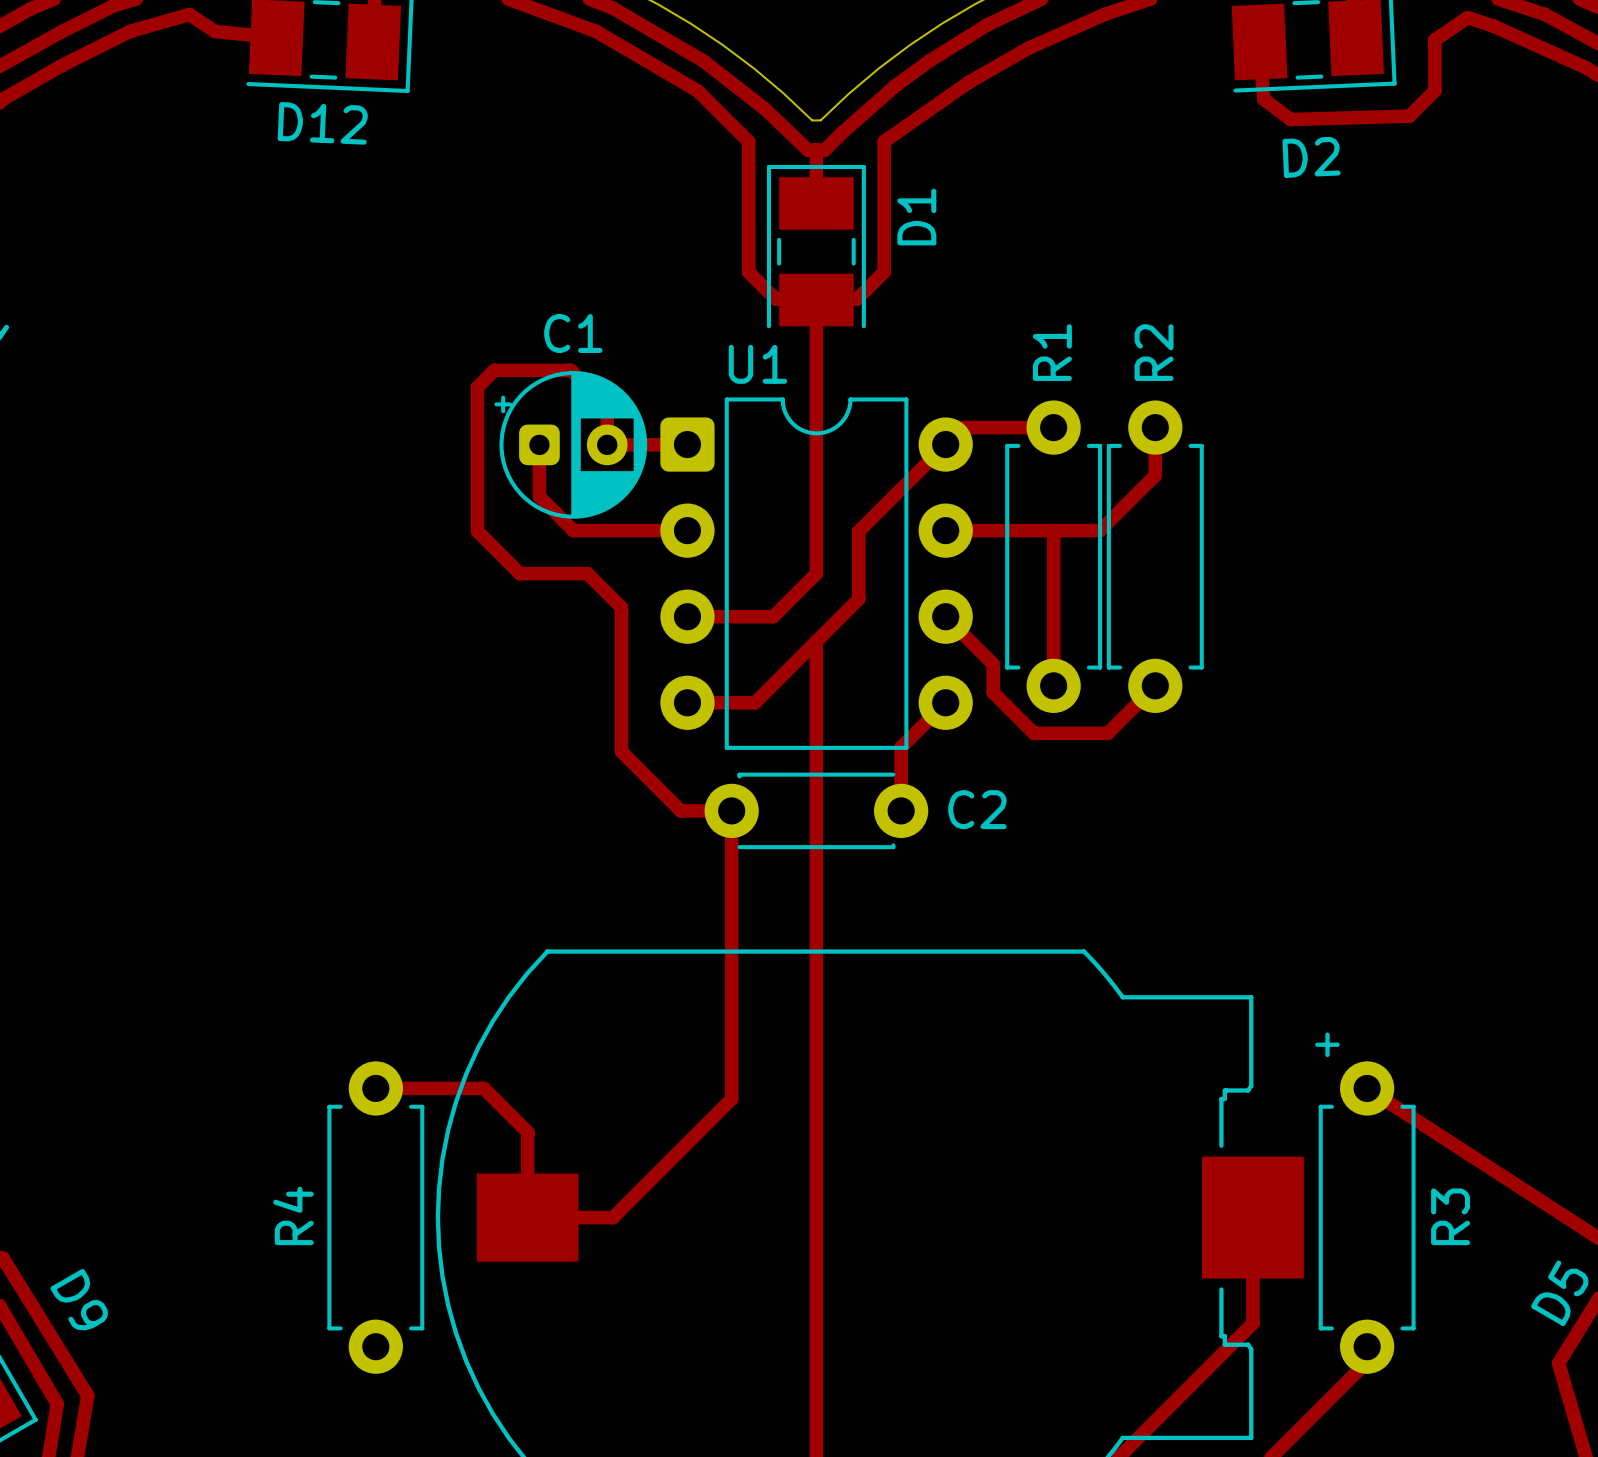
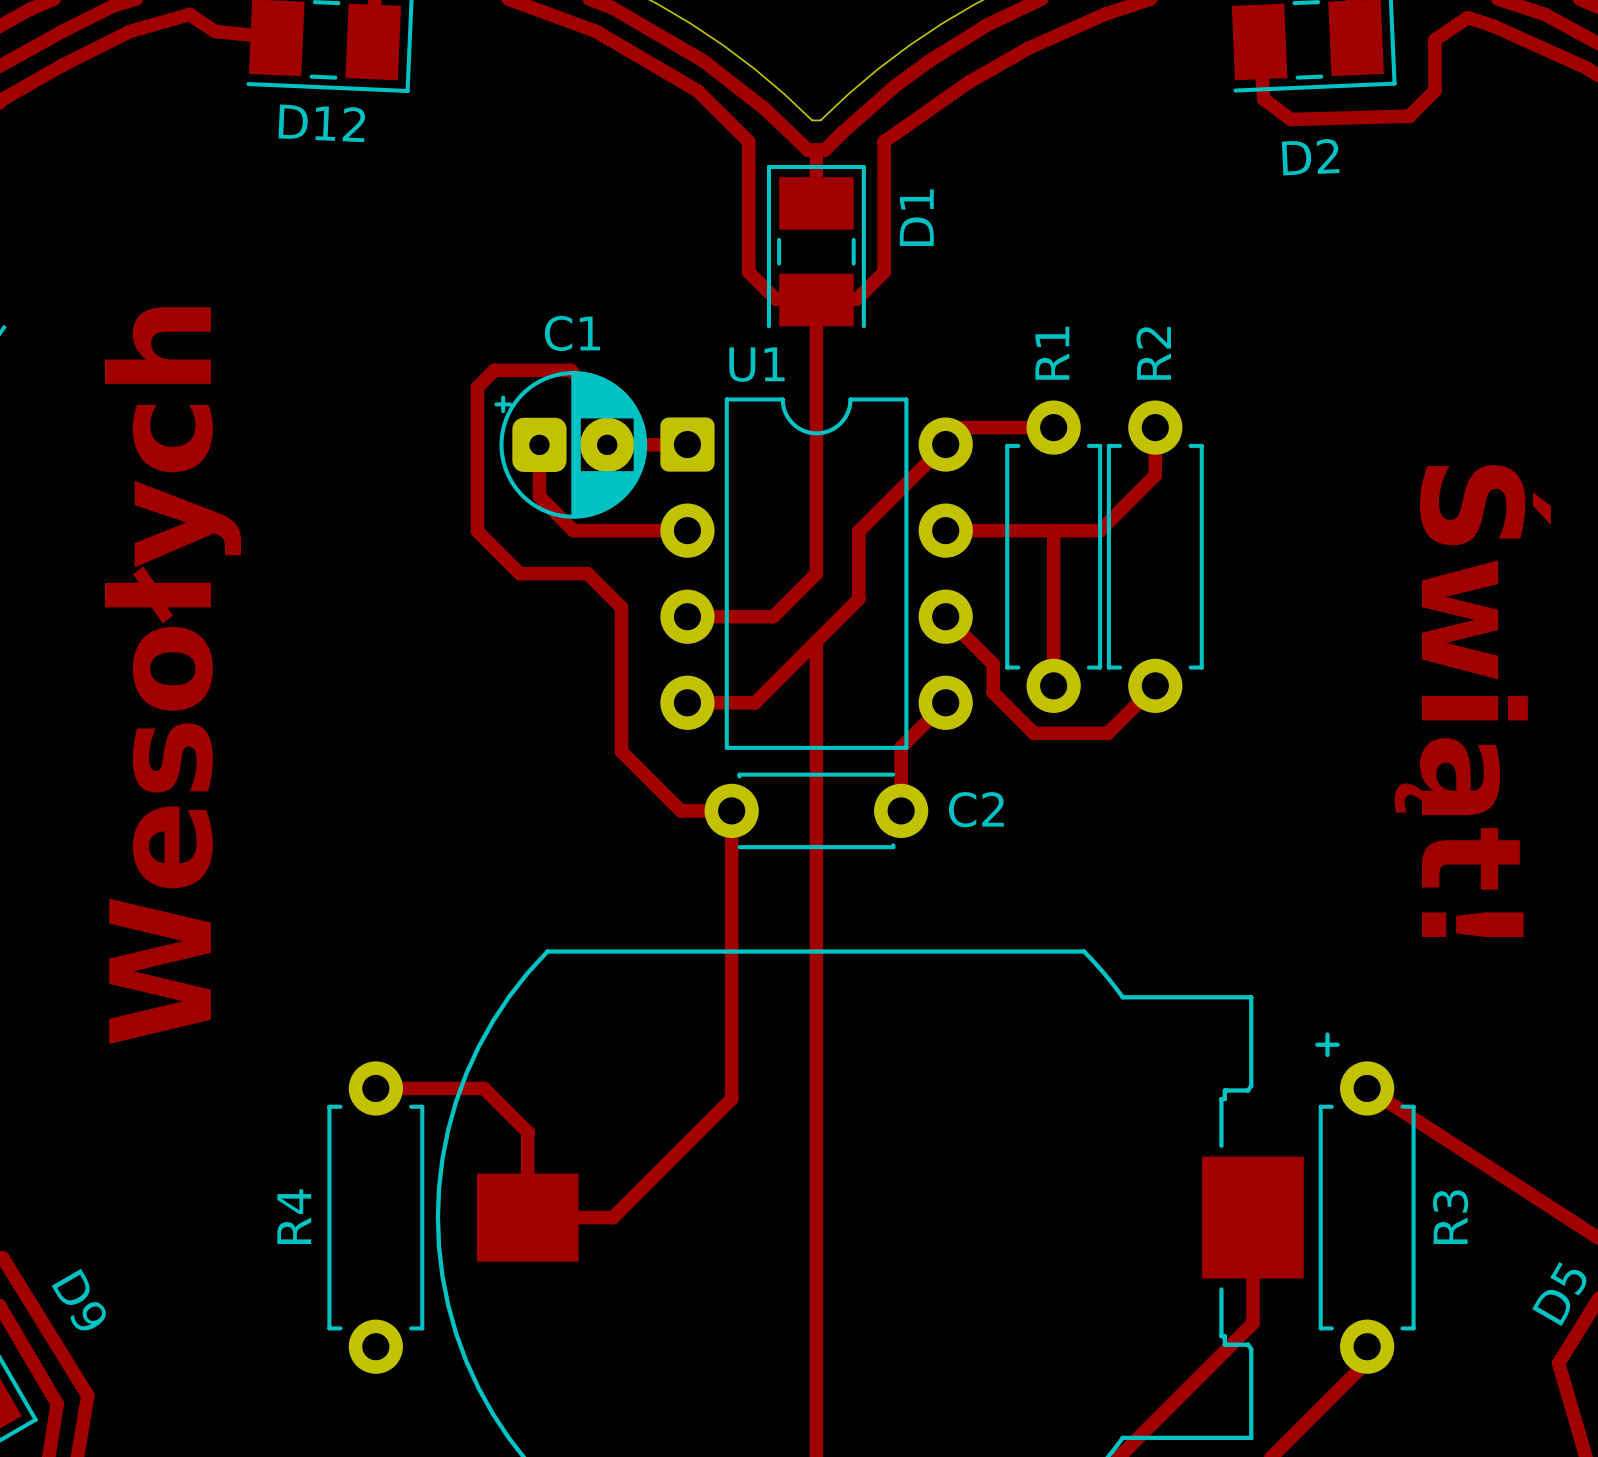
C1 footprint: [494, 371, 648, 519] -> [494, 371, 648, 519]
text: none -> Świąt! (1472, 701)
text: none -> Wesołych (172, 675)

